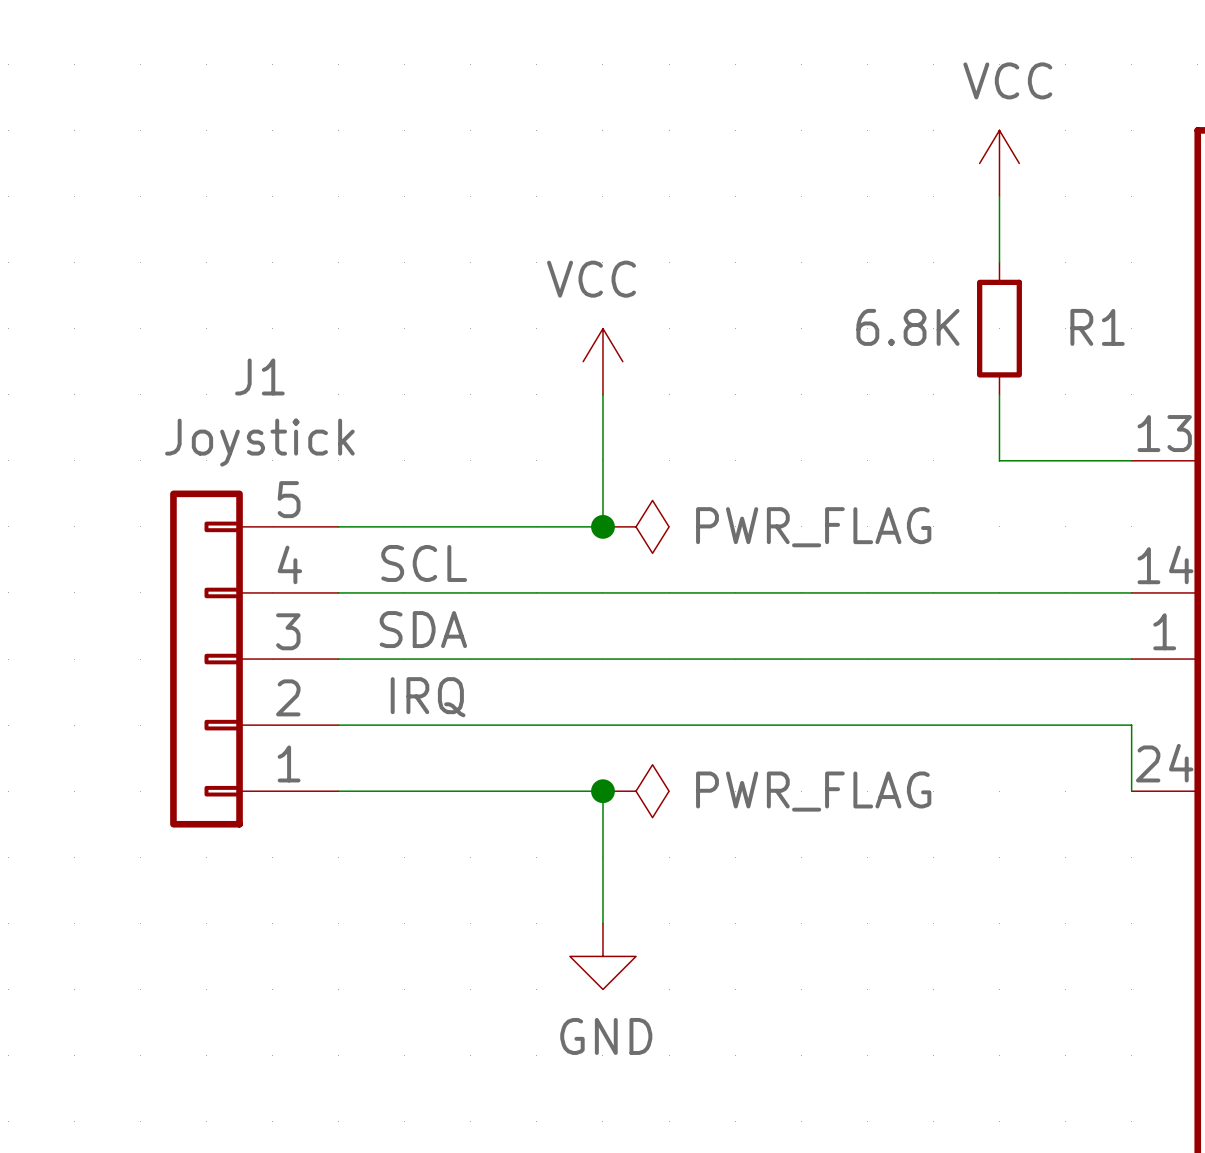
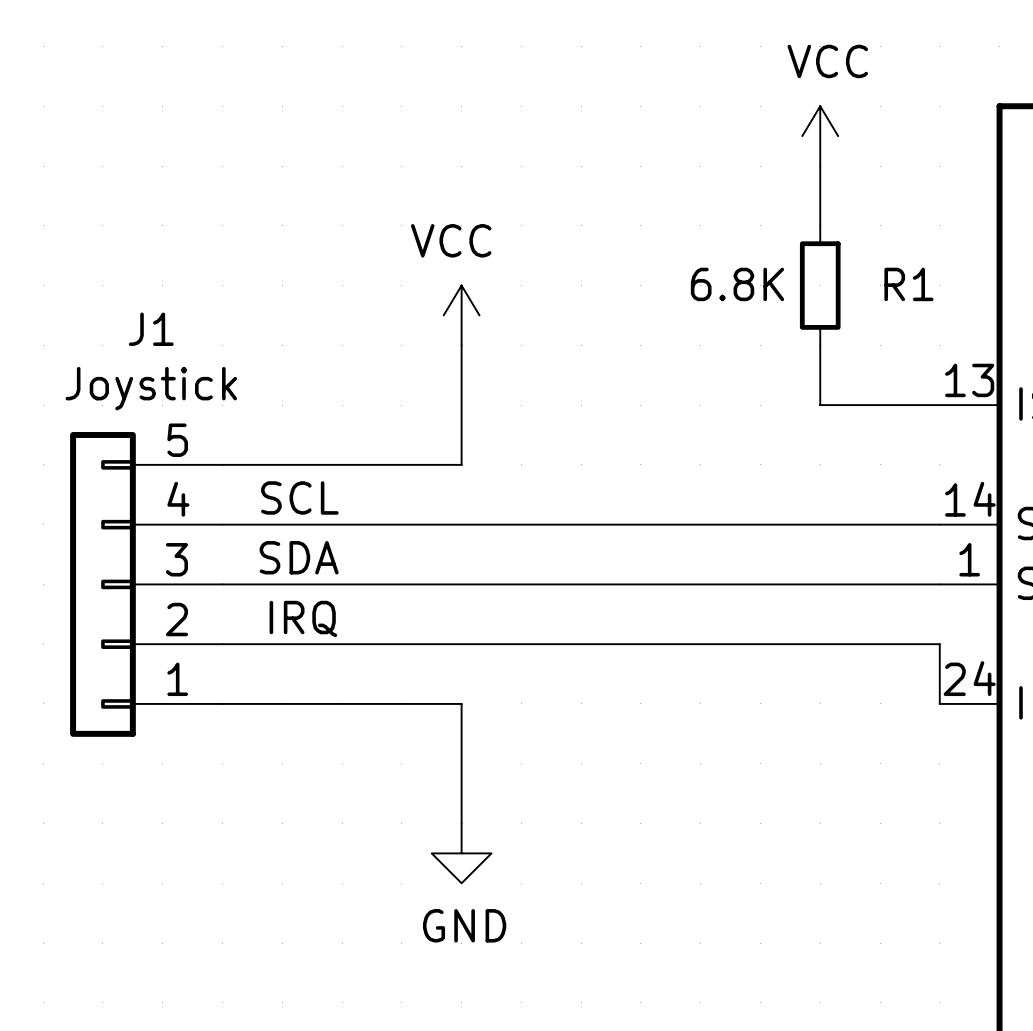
junction: (602, 526) -> none
power symbol: PWR_FLAG (636, 526) -> none
junction: (602, 791) -> none
power symbol: PWR_FLAG (636, 791) -> none

